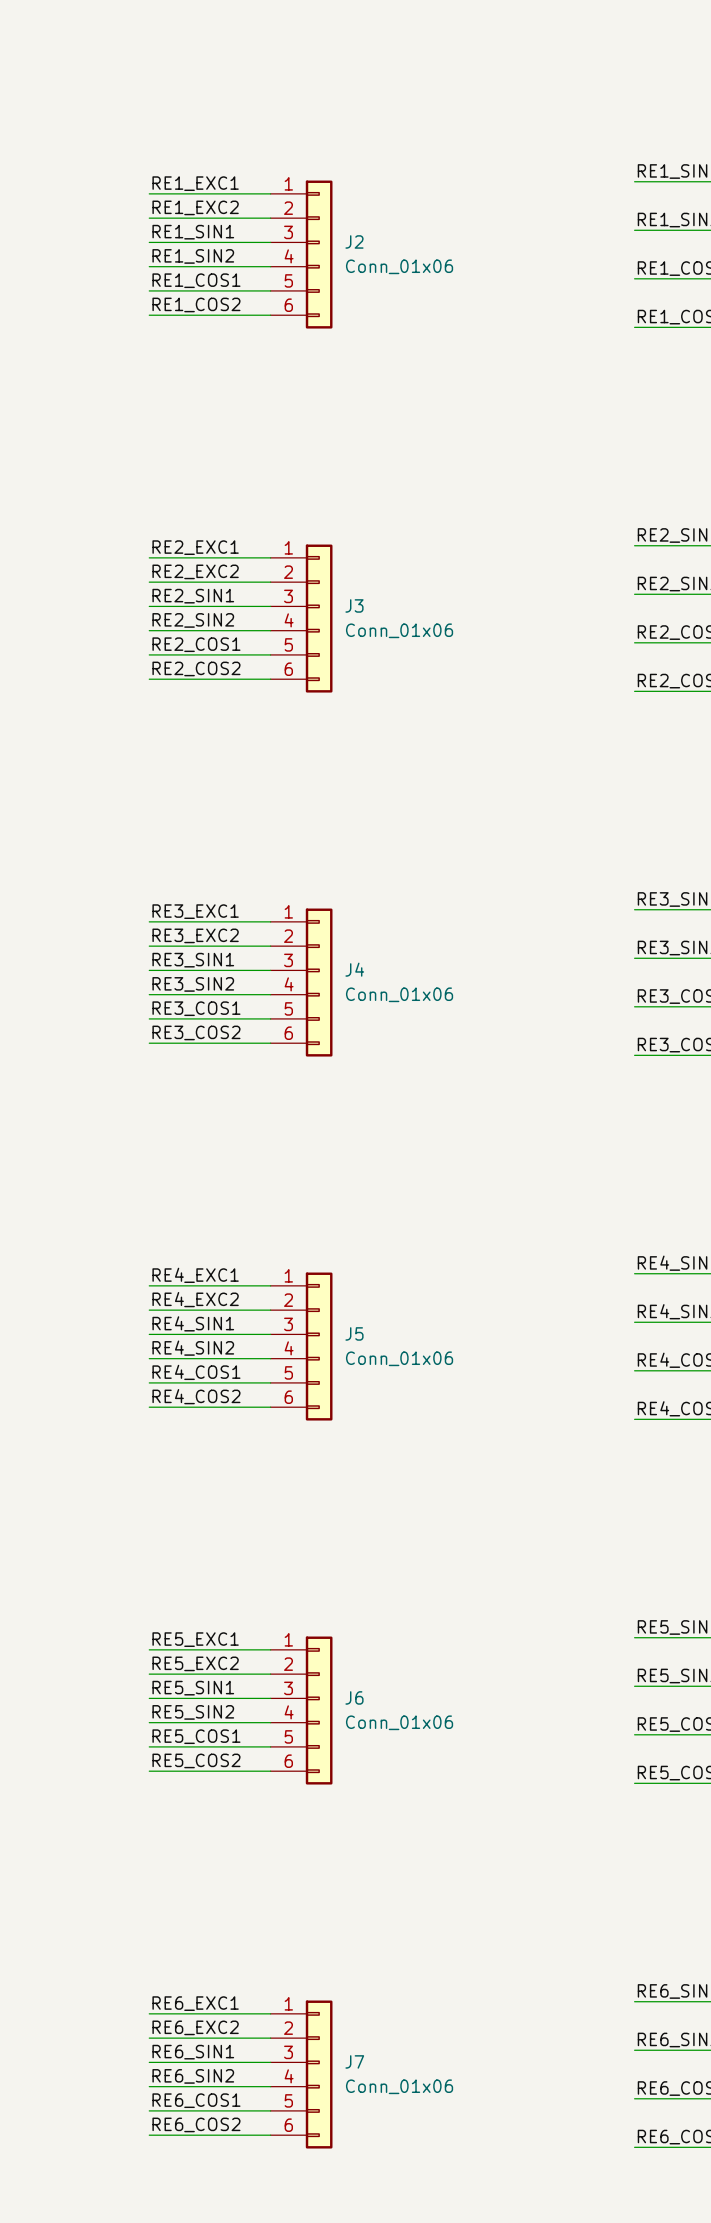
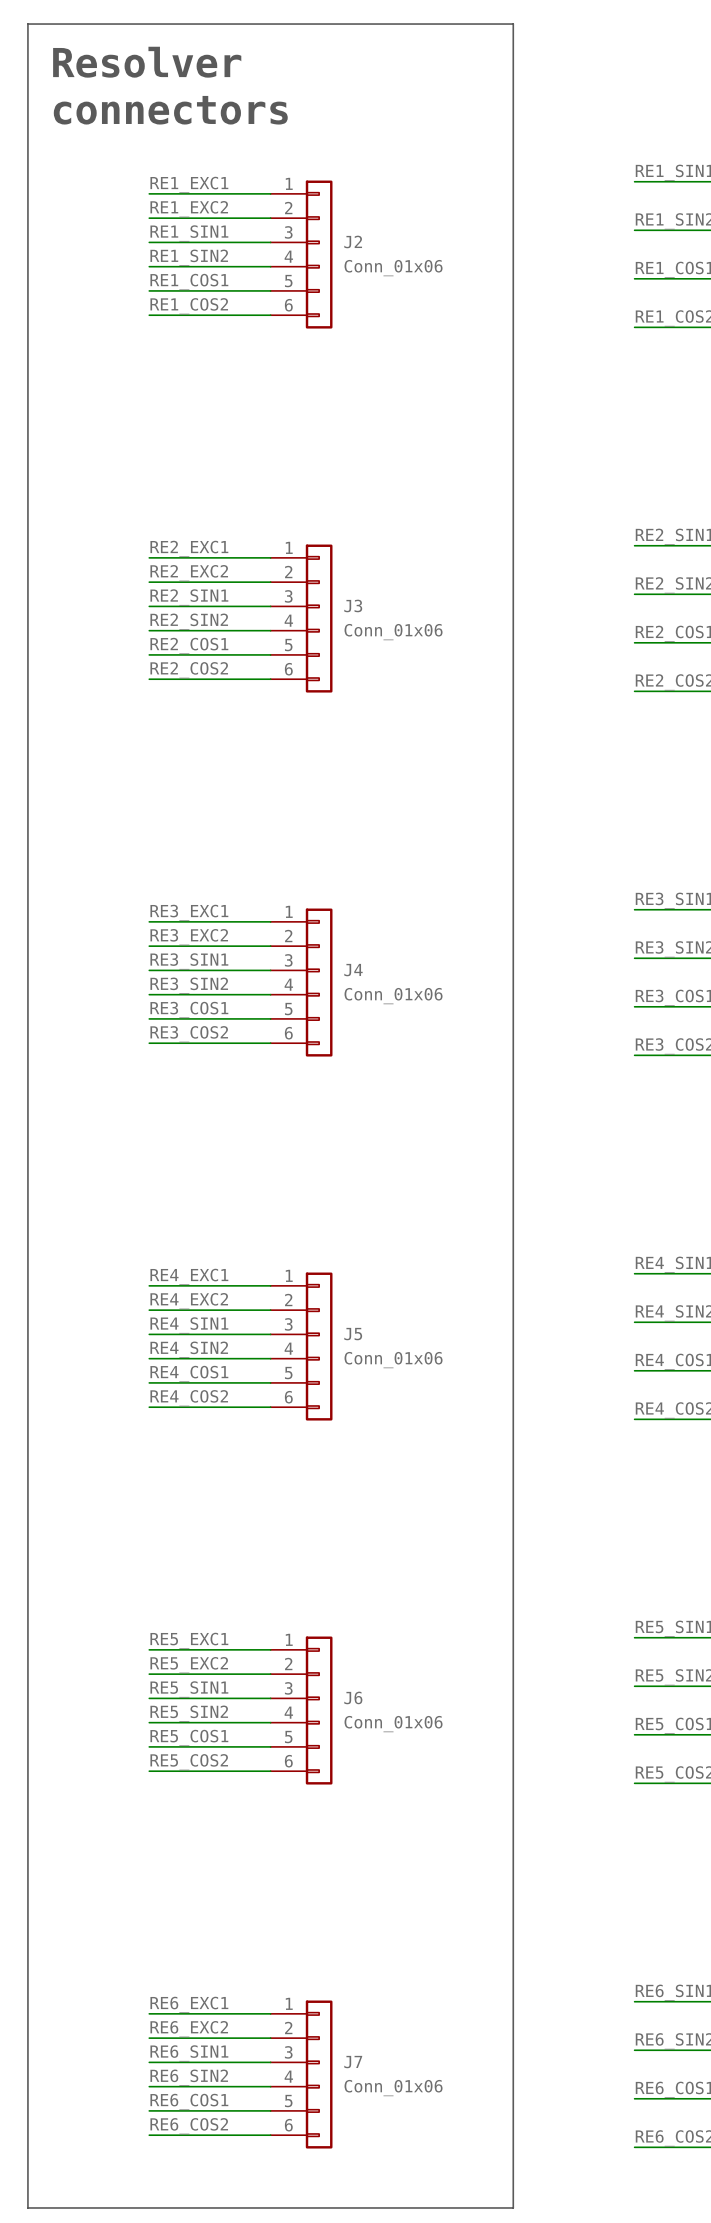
line: none -> (27, 24) (513, 24) (513, 2207) (27, 2207) (27, 24)
text: none -> Resolver (147, 62)
text: none -> connectors (170, 110)

